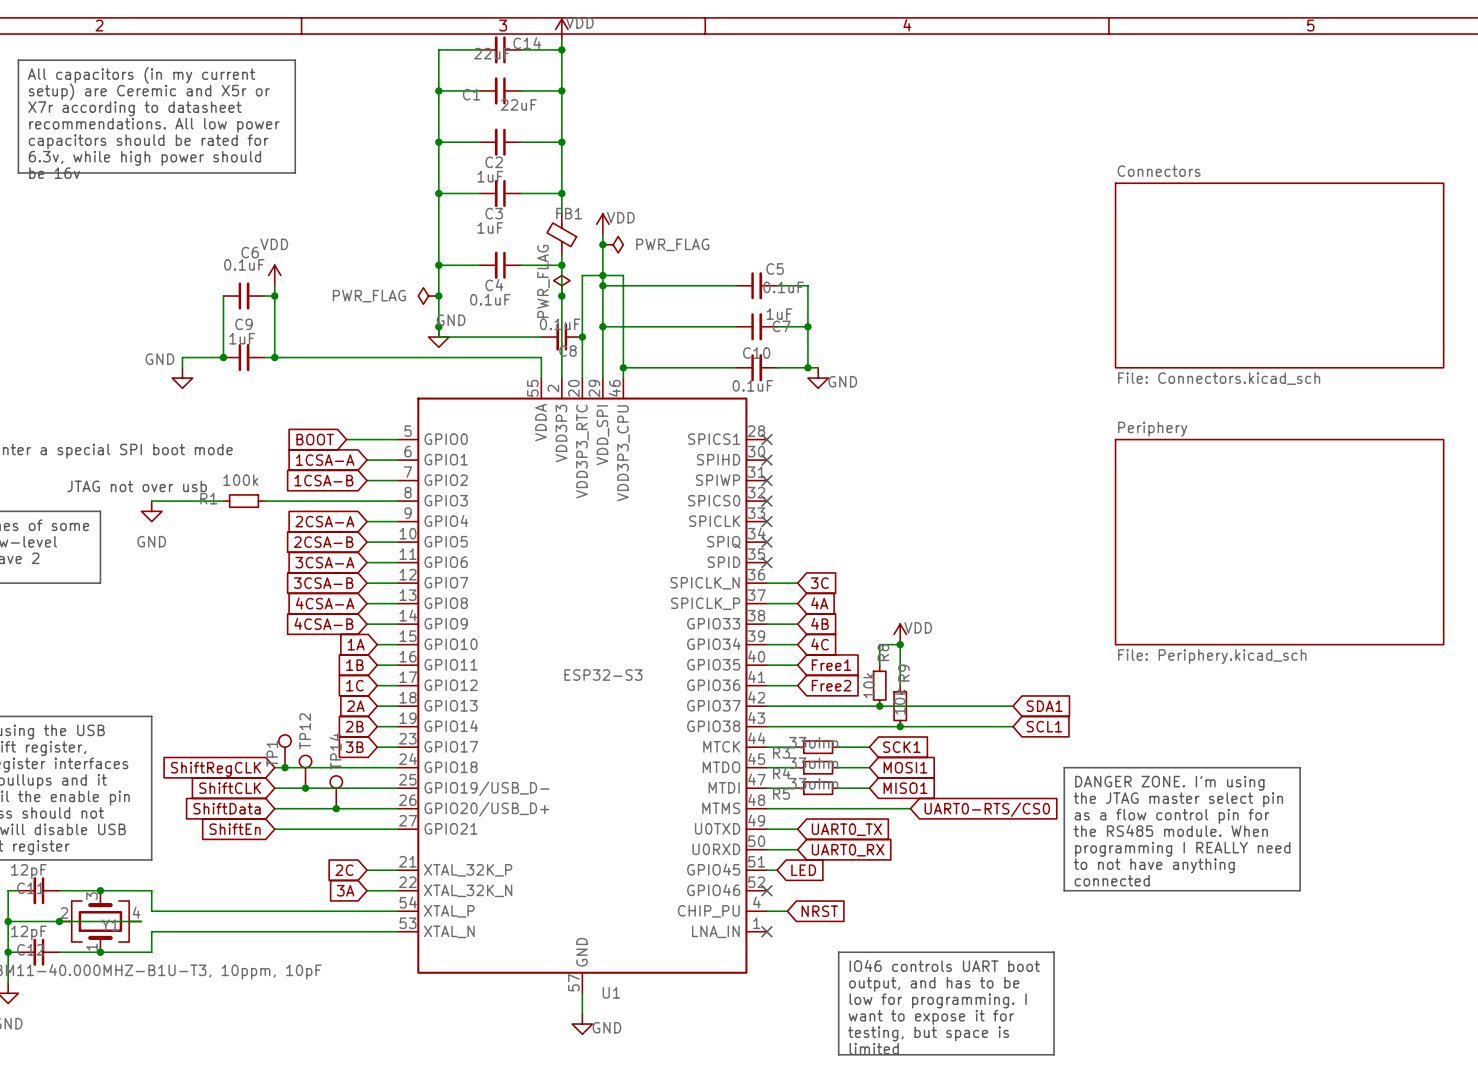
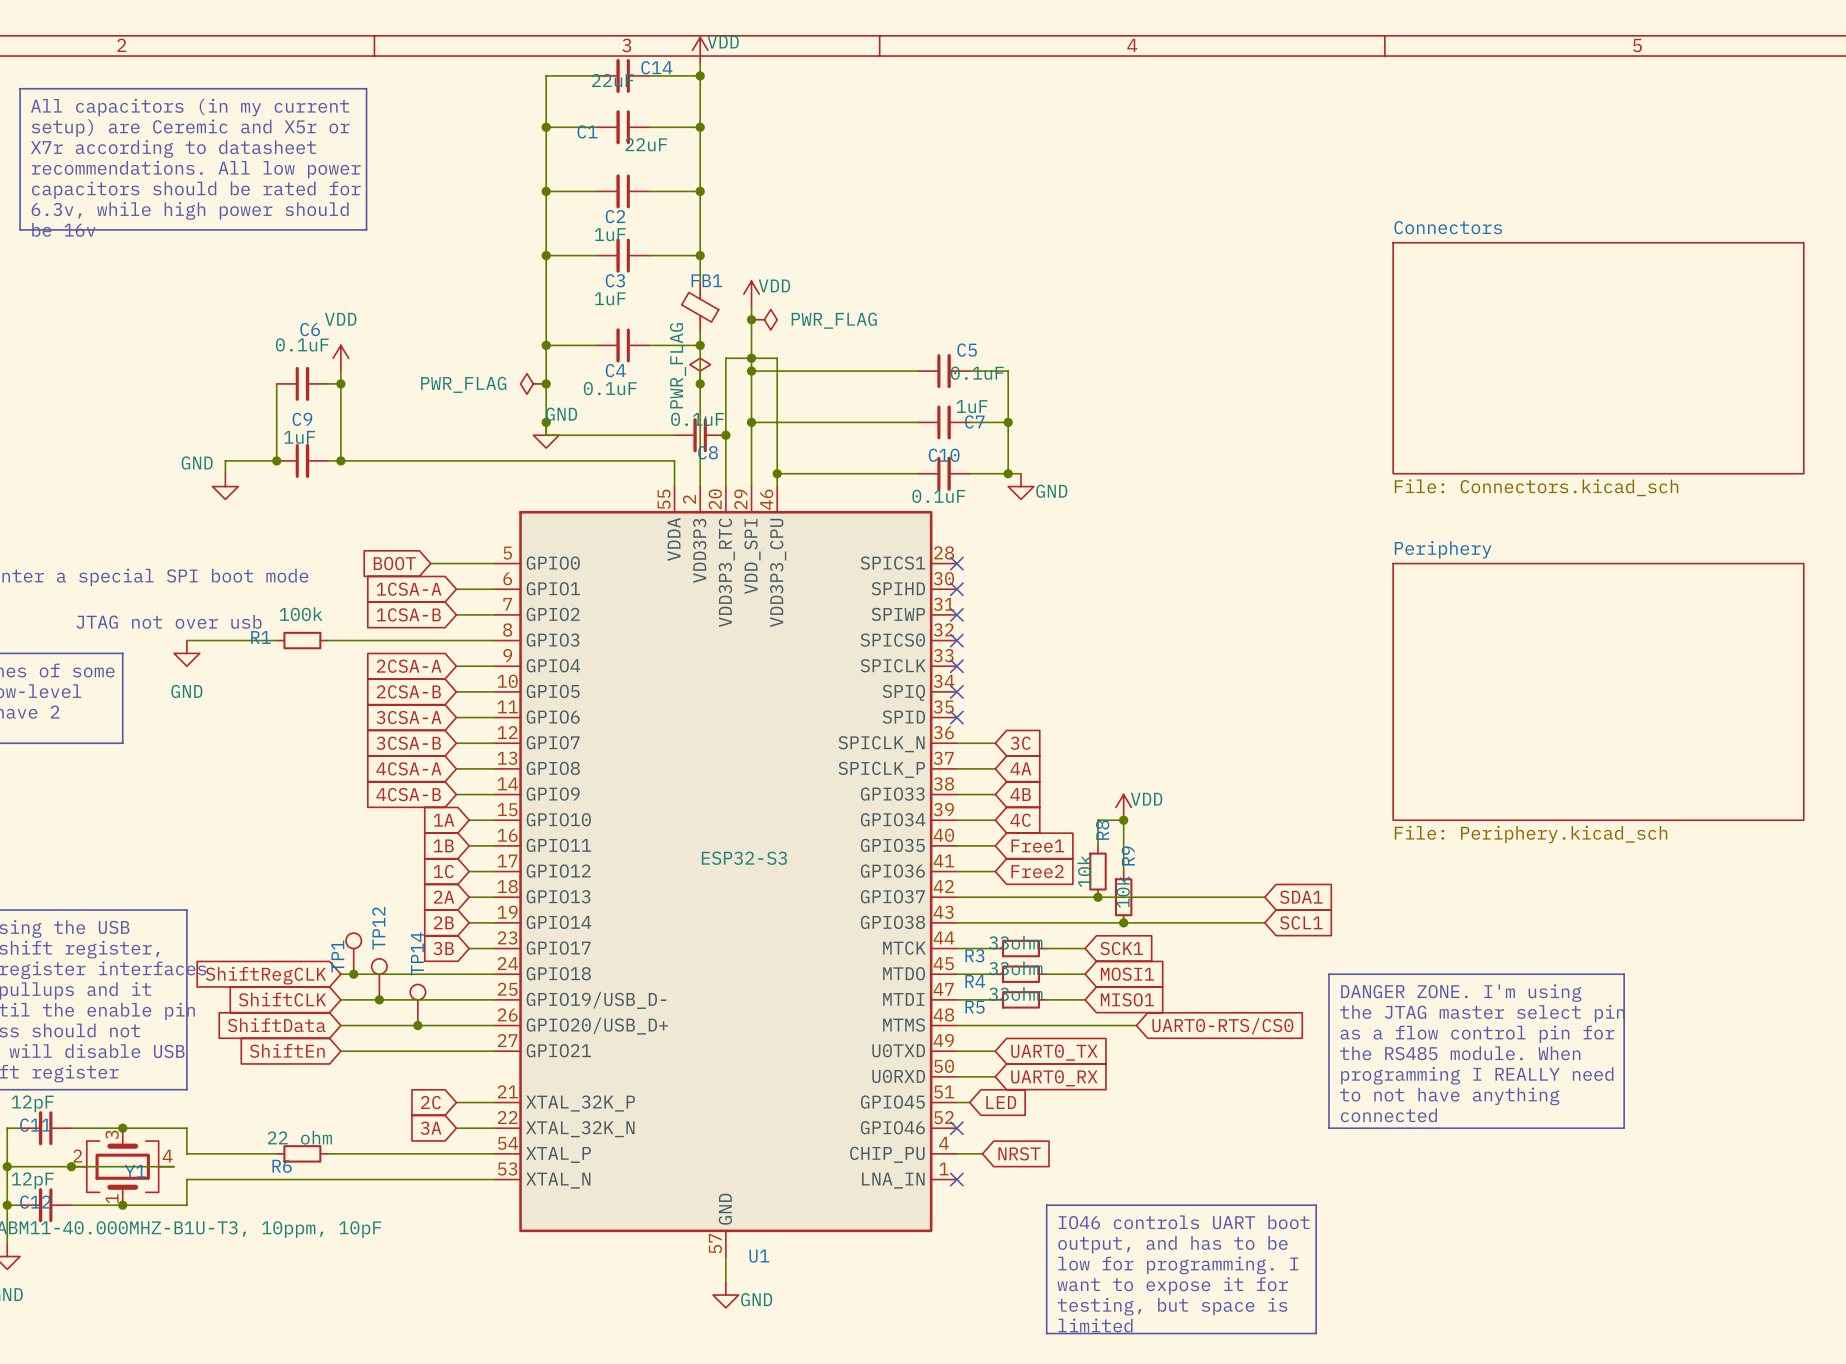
wire: (223, 911) (264, 911) -> none
R6: none -> 22 ohm (302, 1153)

